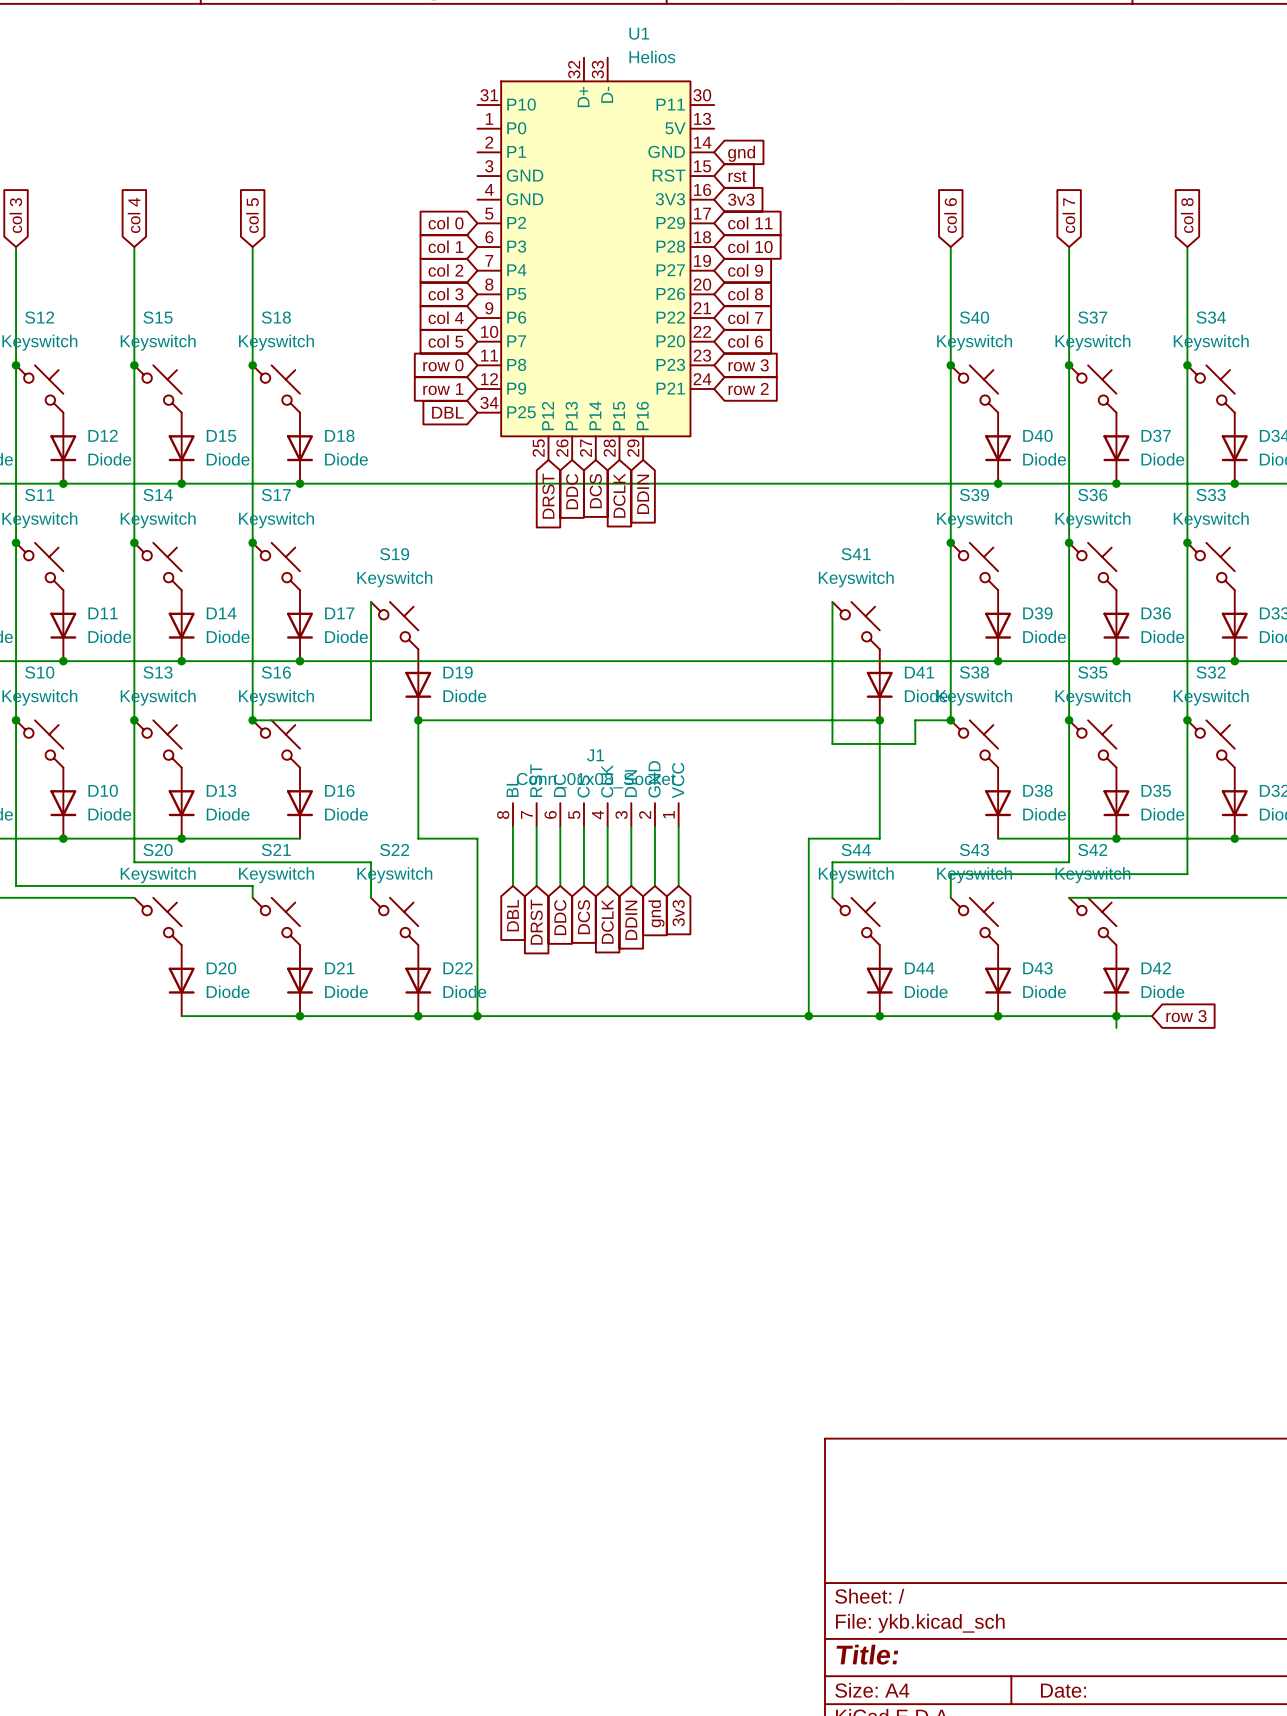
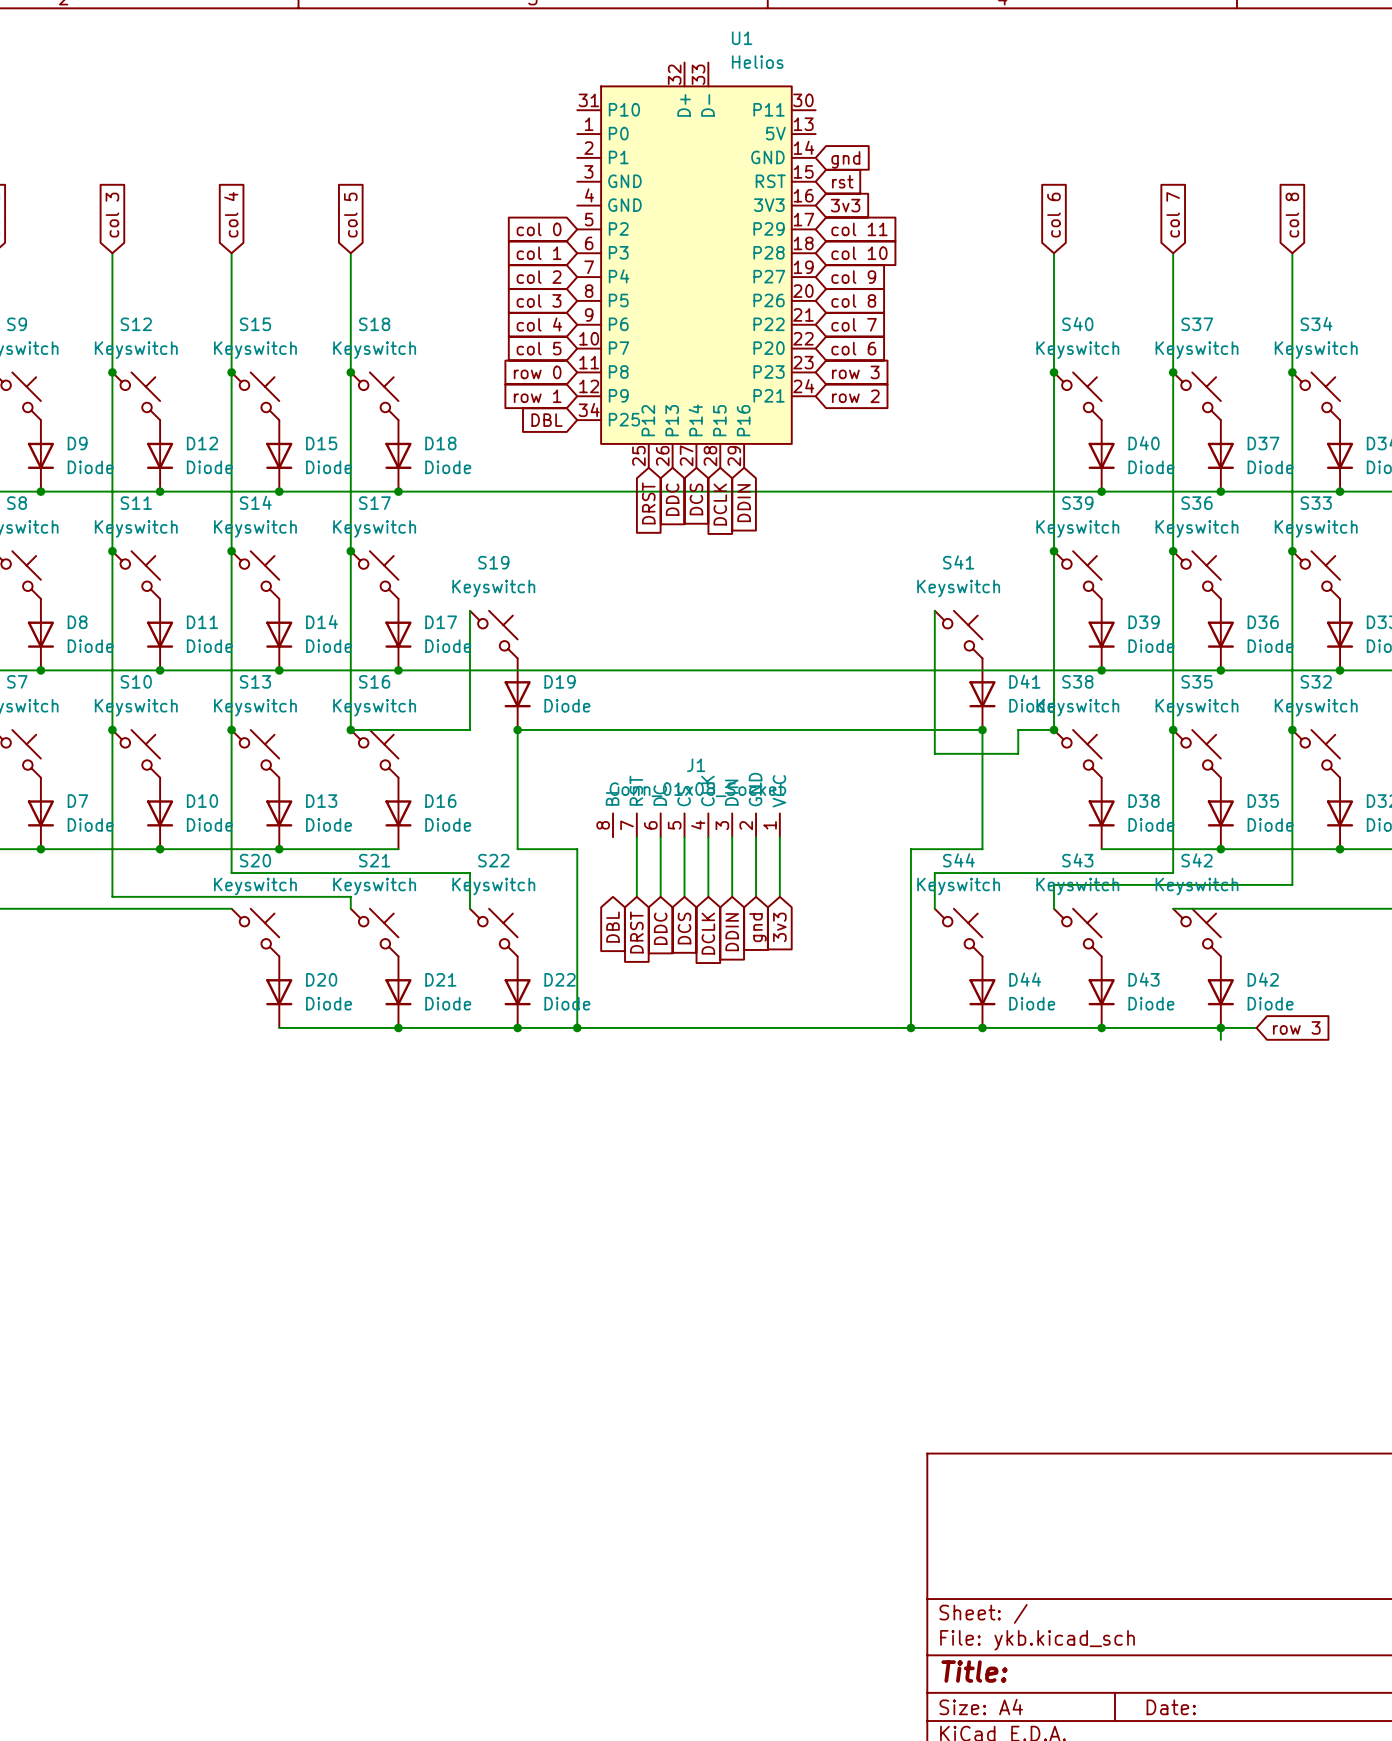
wire: (512, 826) (512, 885) -> none

